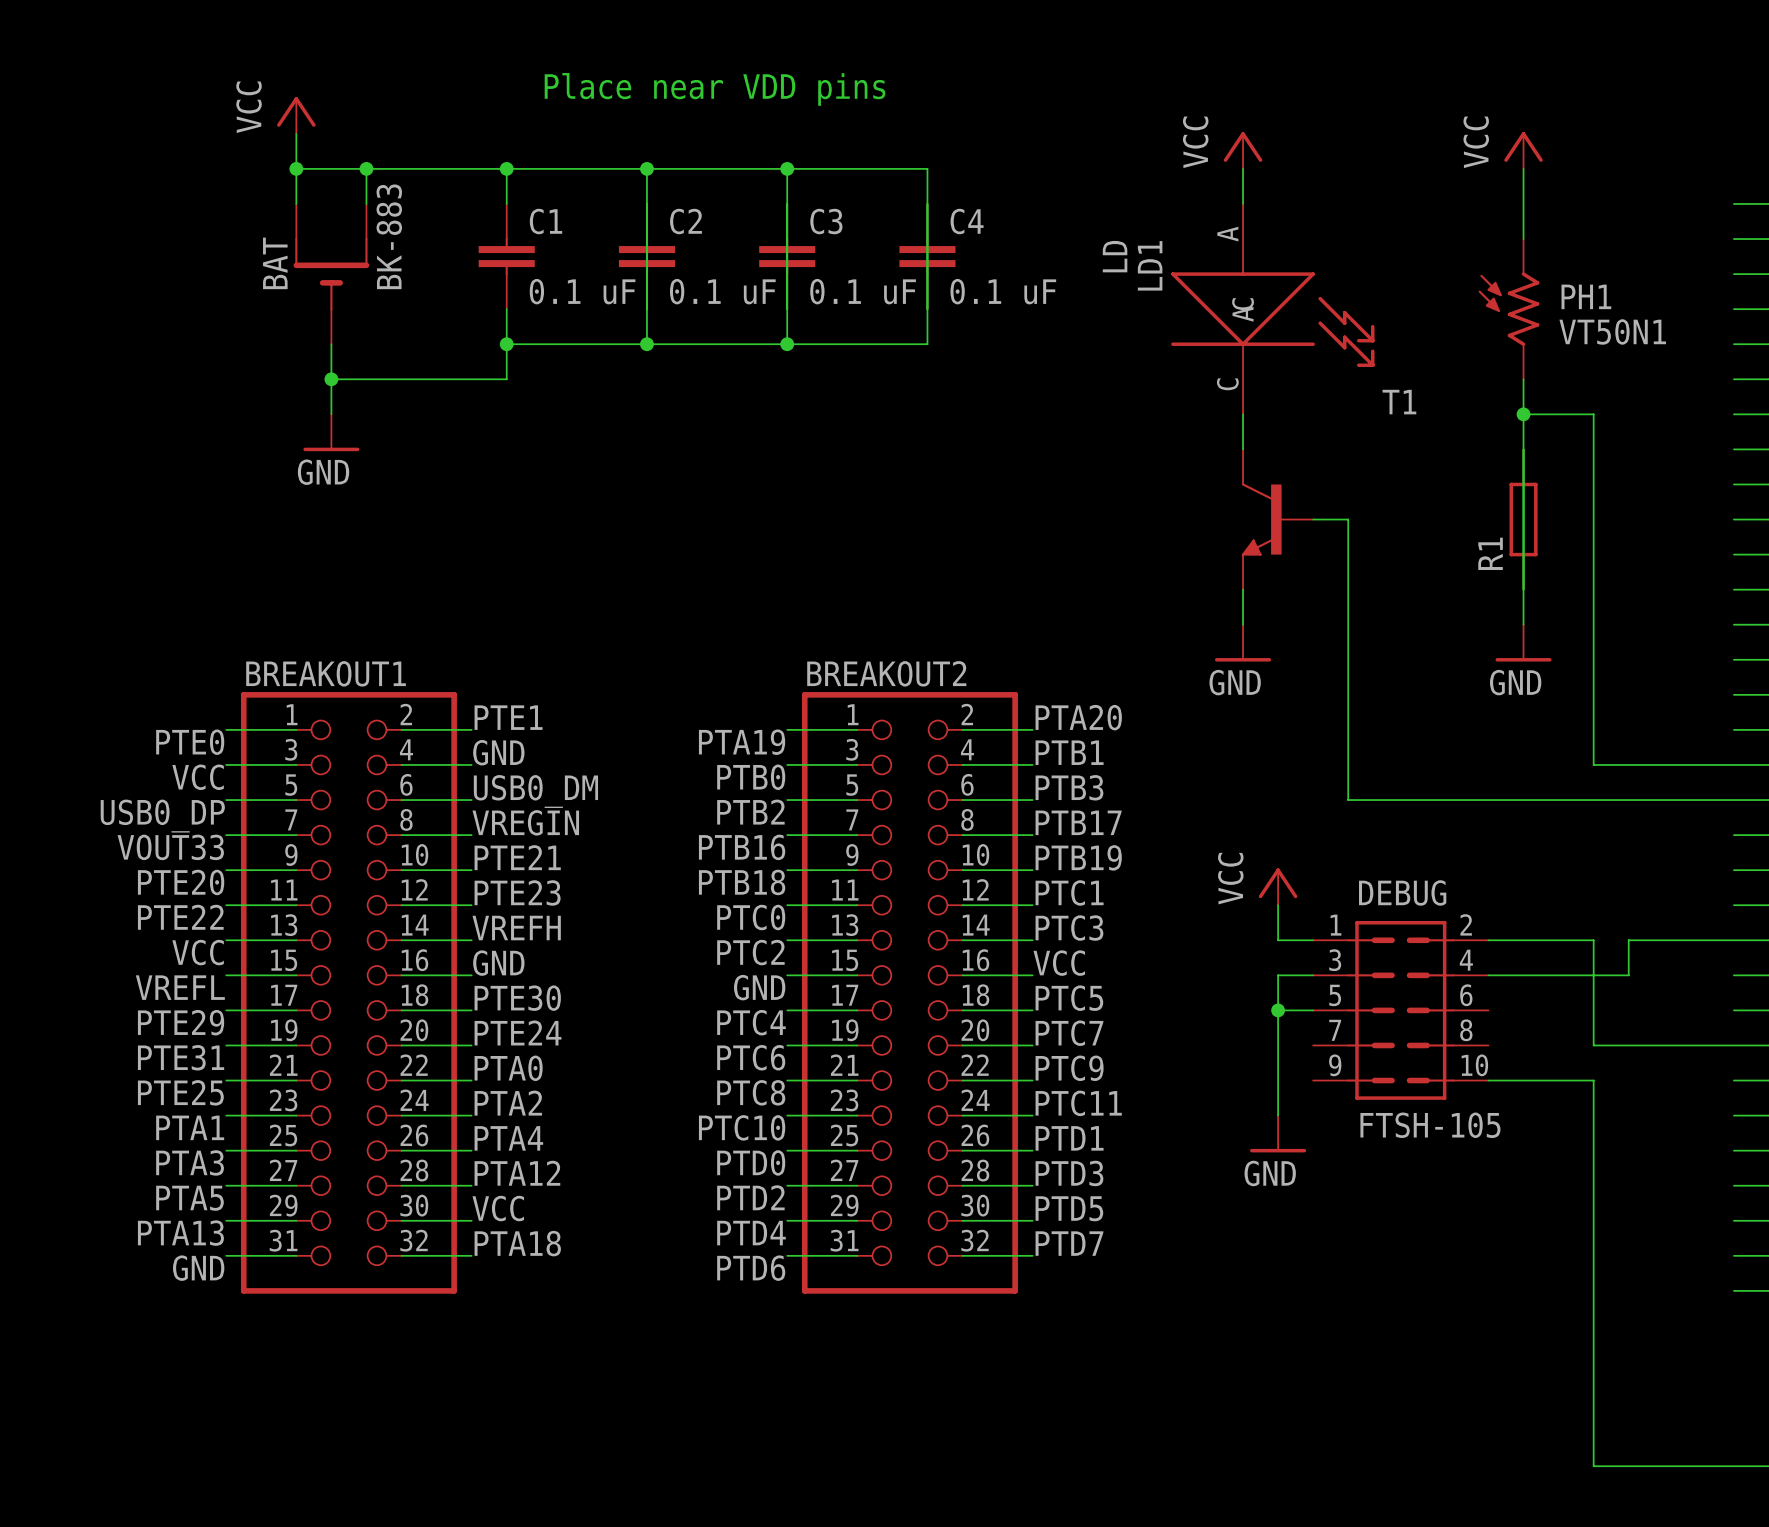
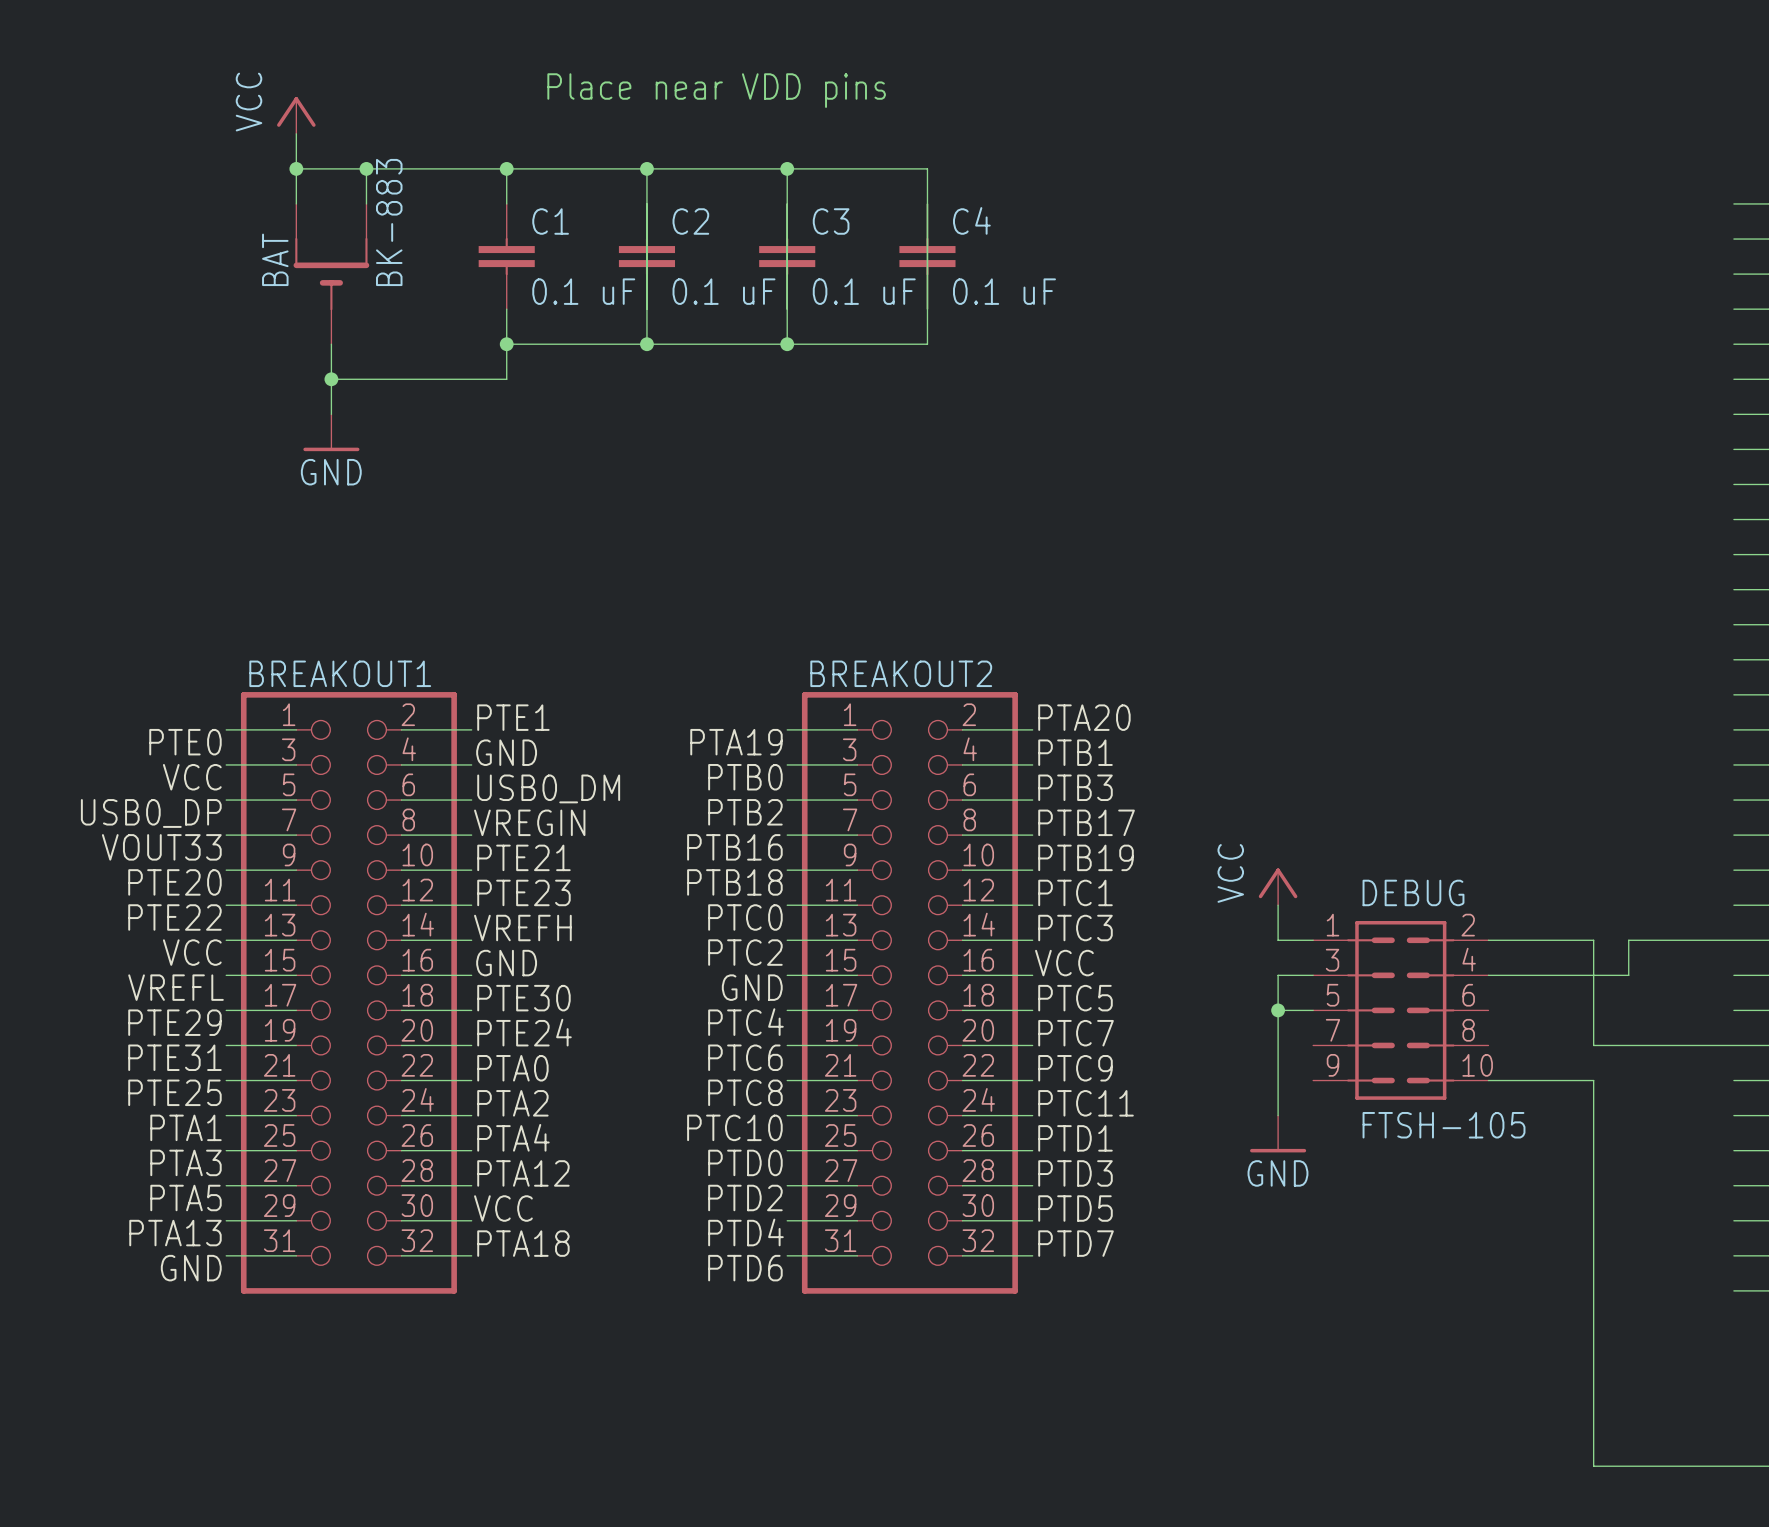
power symbol: VCC (1243, 150) -> none
power symbol: VCC (1523, 150) -> none
wire: (1243, 168) (1243, 203) -> none
wire: (1523, 168) (1523, 239) -> none
LD1: LD (1272, 309) -> none
PH1: VT50N1 (1508, 309) -> none
wire: (1523, 379) (1523, 624) -> none
wire: (1243, 414) (1243, 449) -> none
wire: (1523, 414) (1593, 414) (1593, 764) (1733, 764) -> none
junction: (1523, 414) -> none
T1: (1277, 519) -> none
wire: (1313, 519) (1348, 519) (1348, 800) (1733, 800) -> none
R1: (1523, 519) -> none
wire: (1243, 589) (1243, 624) -> none
power symbol: GND (1243, 643) -> none
power symbol: GND (1523, 643) -> none

